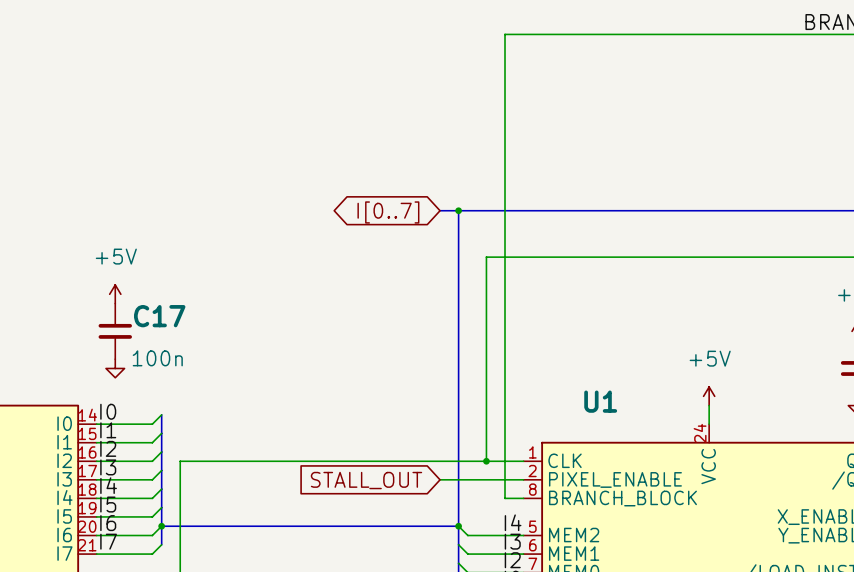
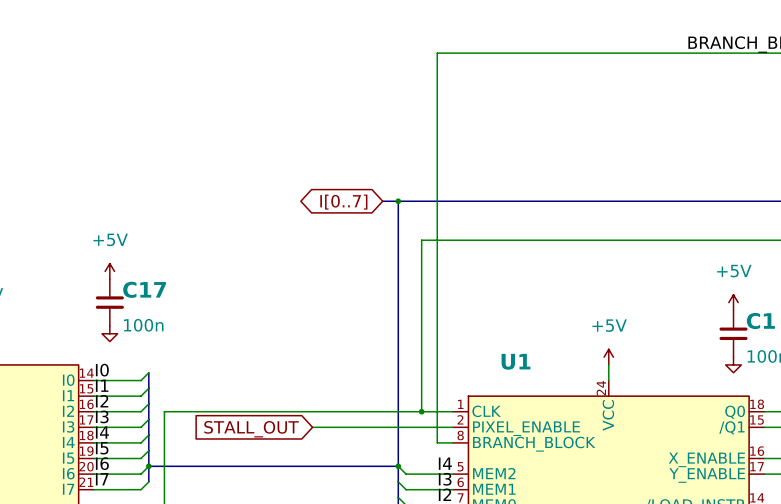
wire: none -> (312, 427) (382, 427)
global label position: STALL_OUT (366, 480) -> STALL_OUT (251, 429)

